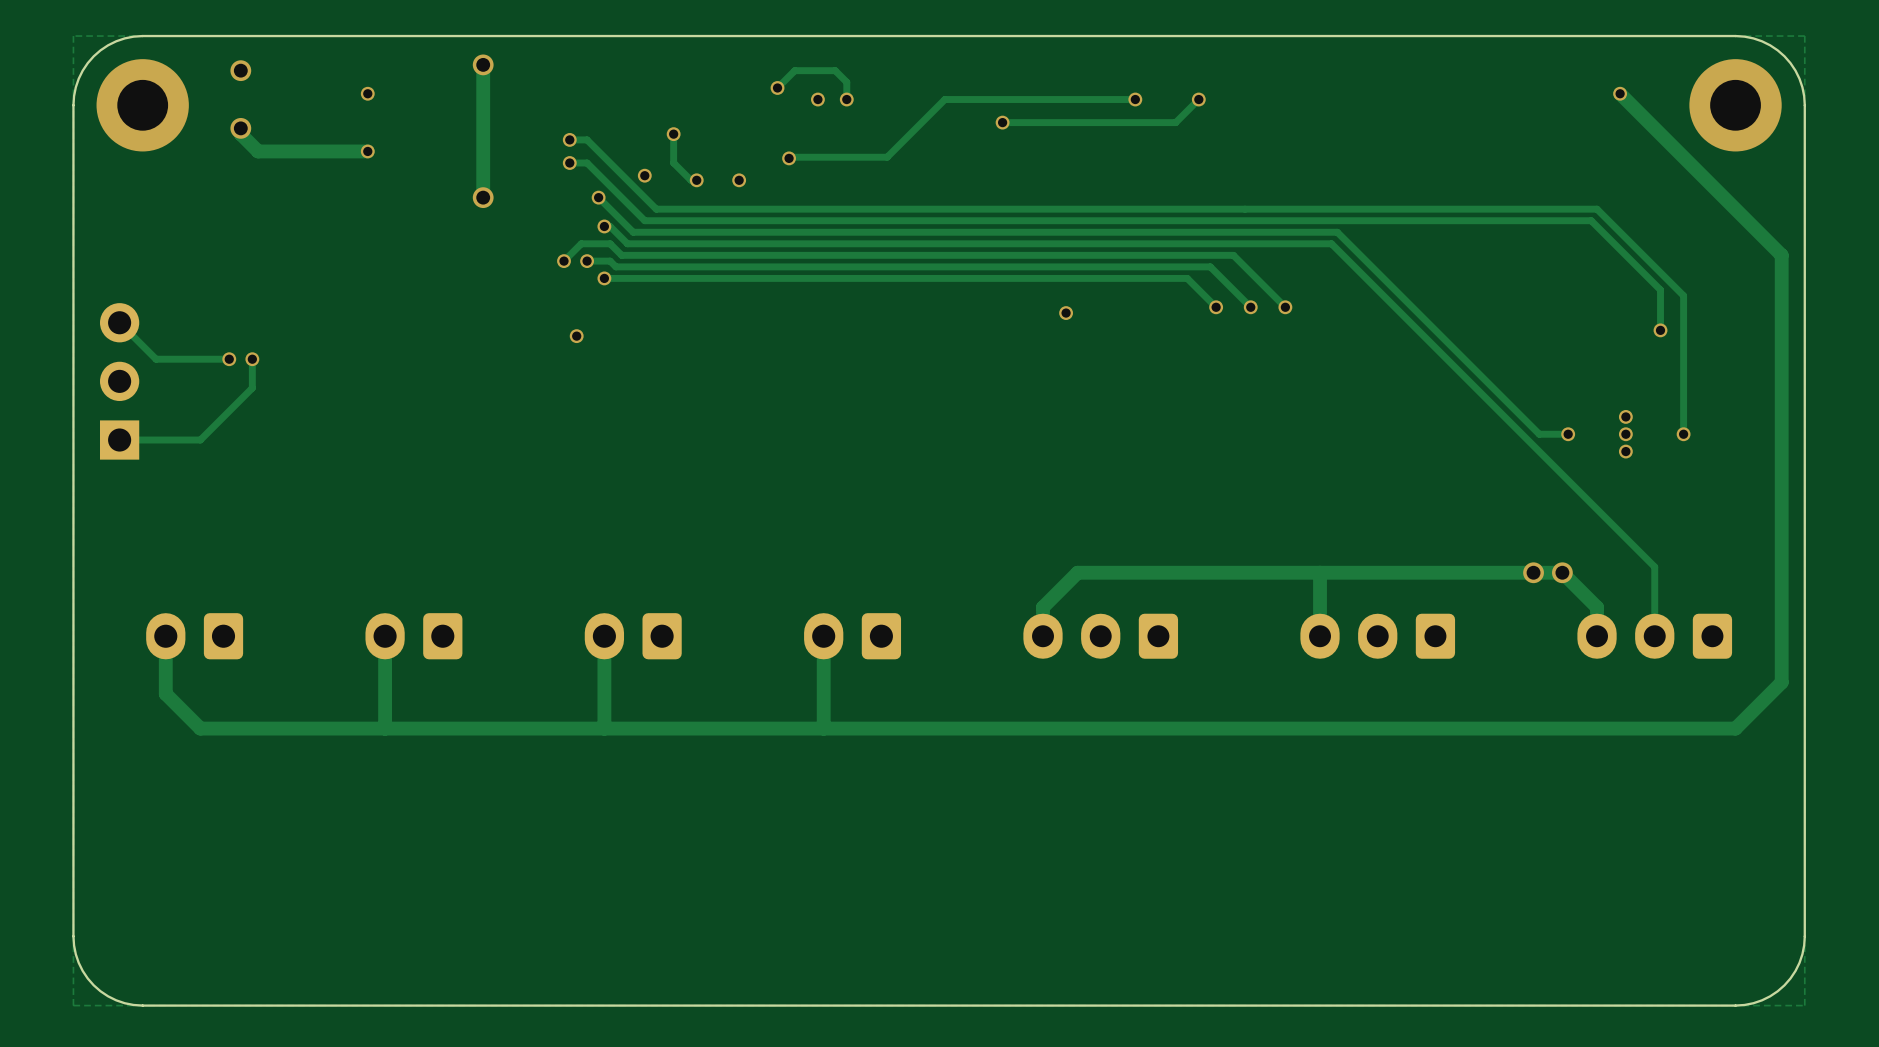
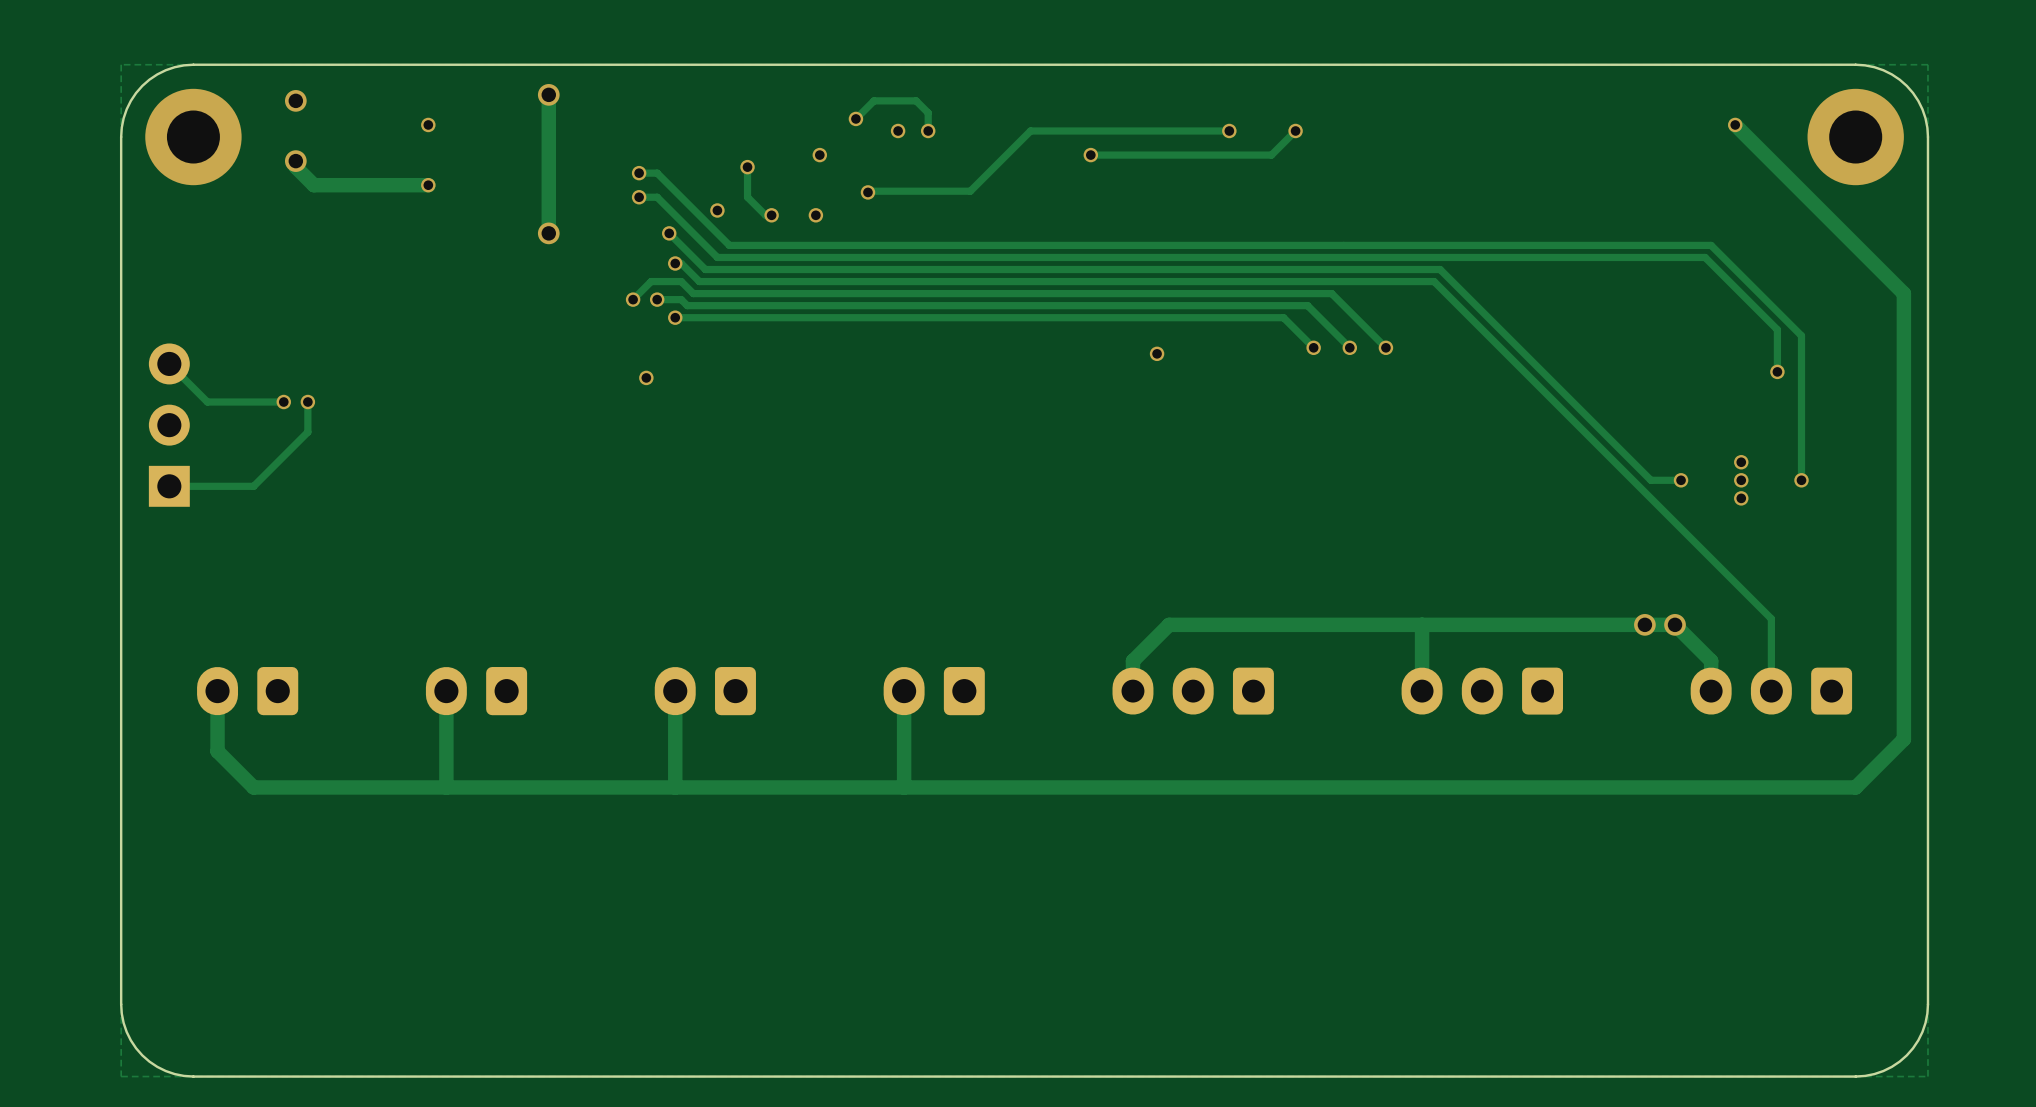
via: none -> (819, 155)

